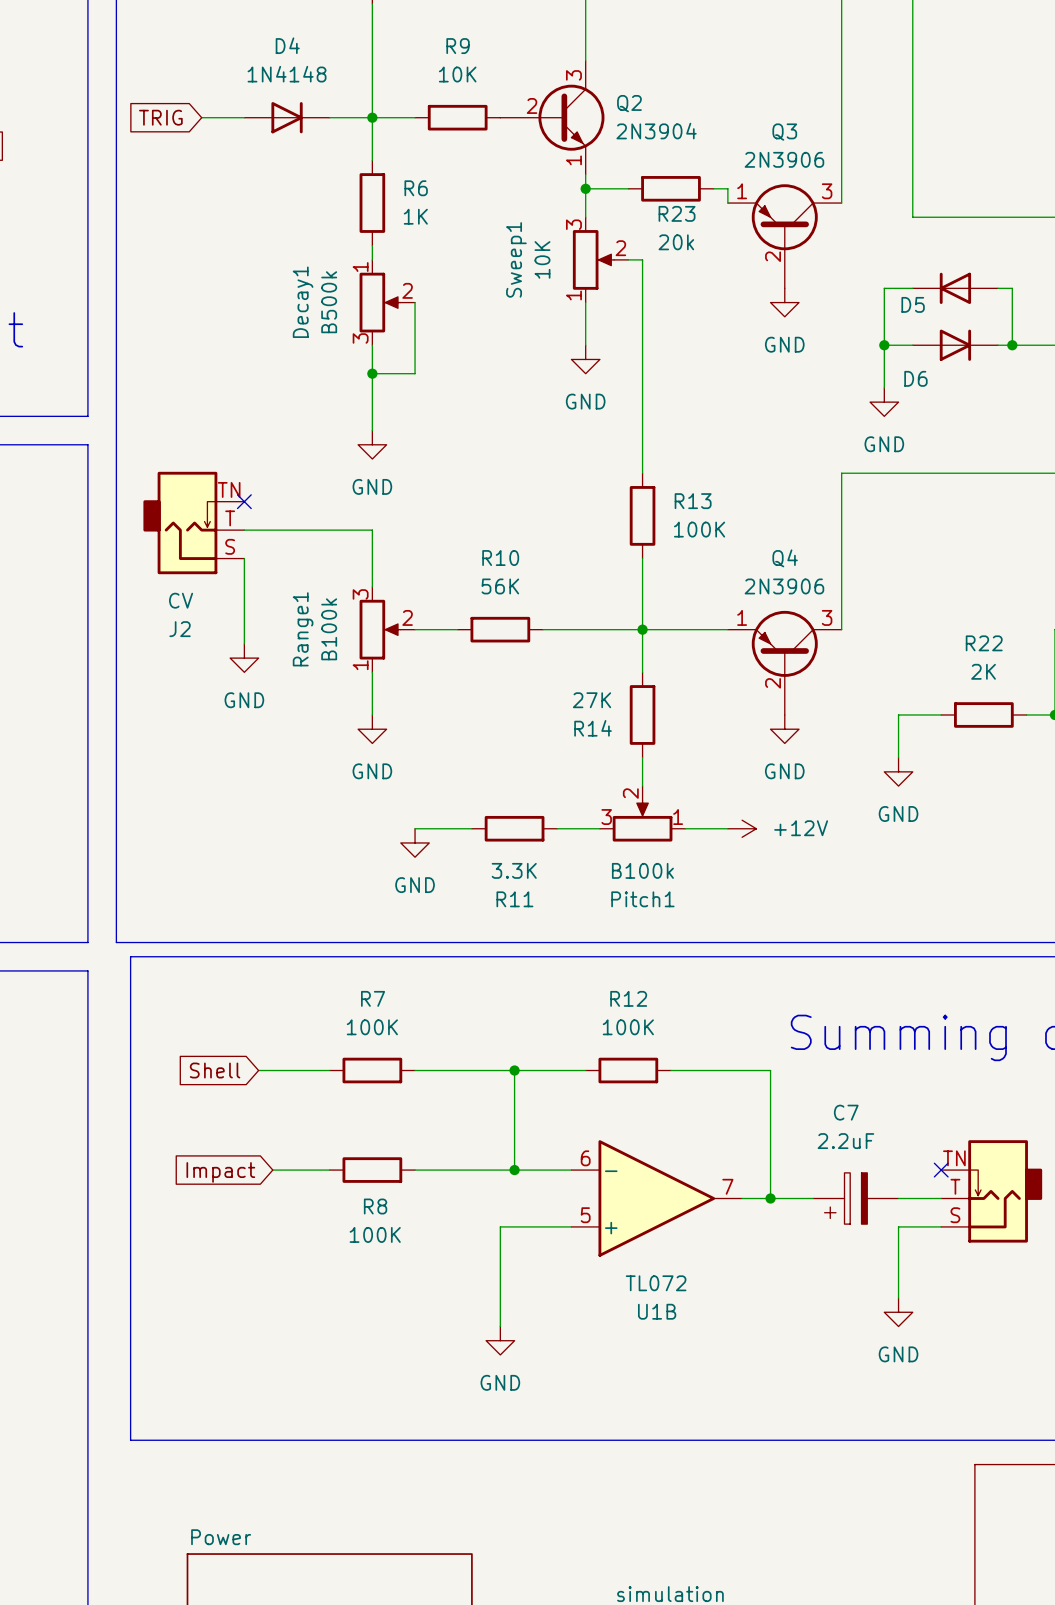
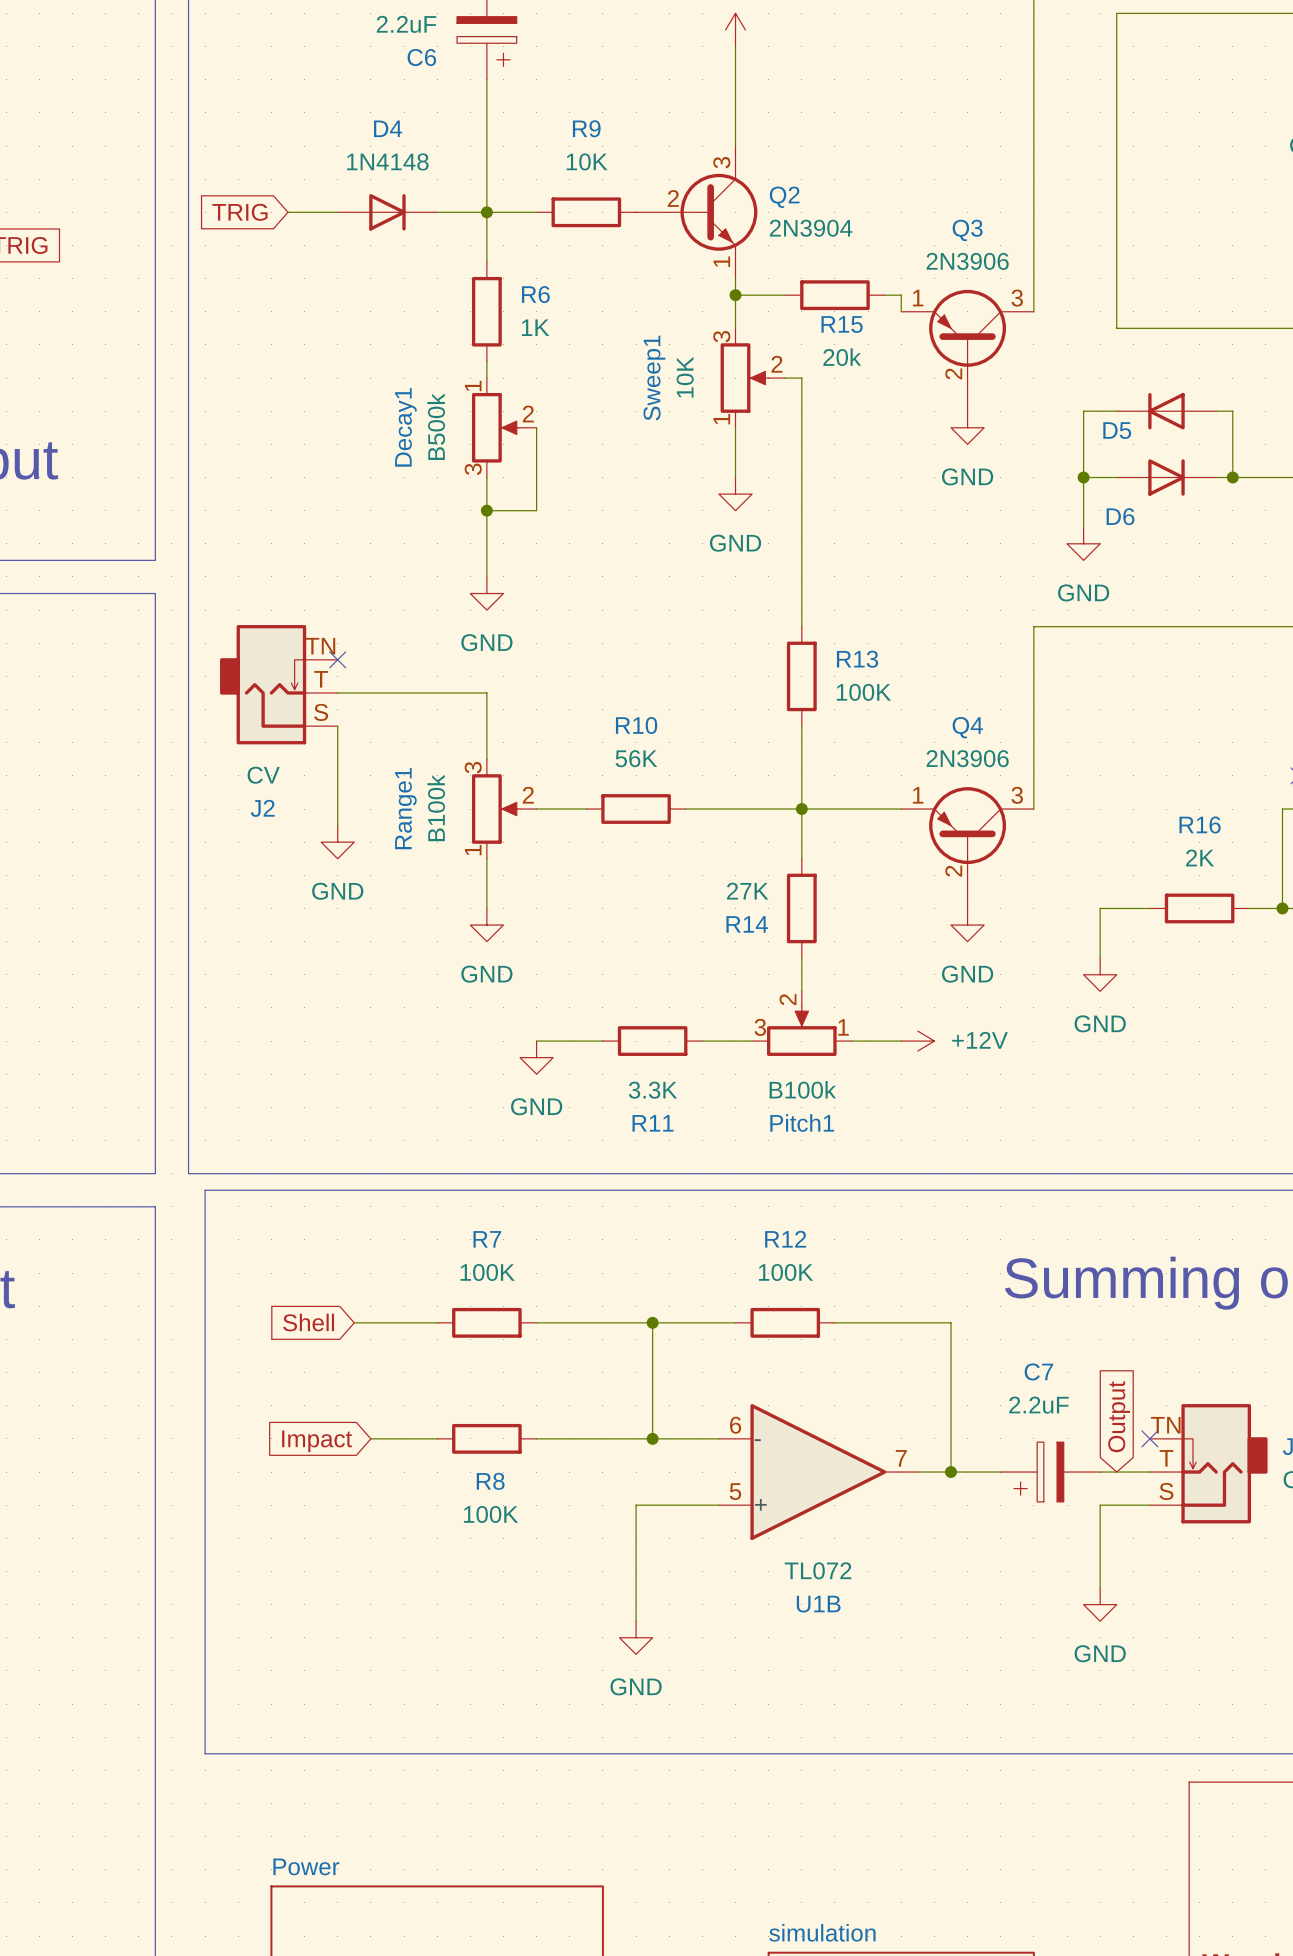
R23 name: R23 (677, 213) -> R15 (842, 324)
R22 name: R22 (984, 643) -> R16 (1200, 824)
global label: none -> Output (1119, 1416)

